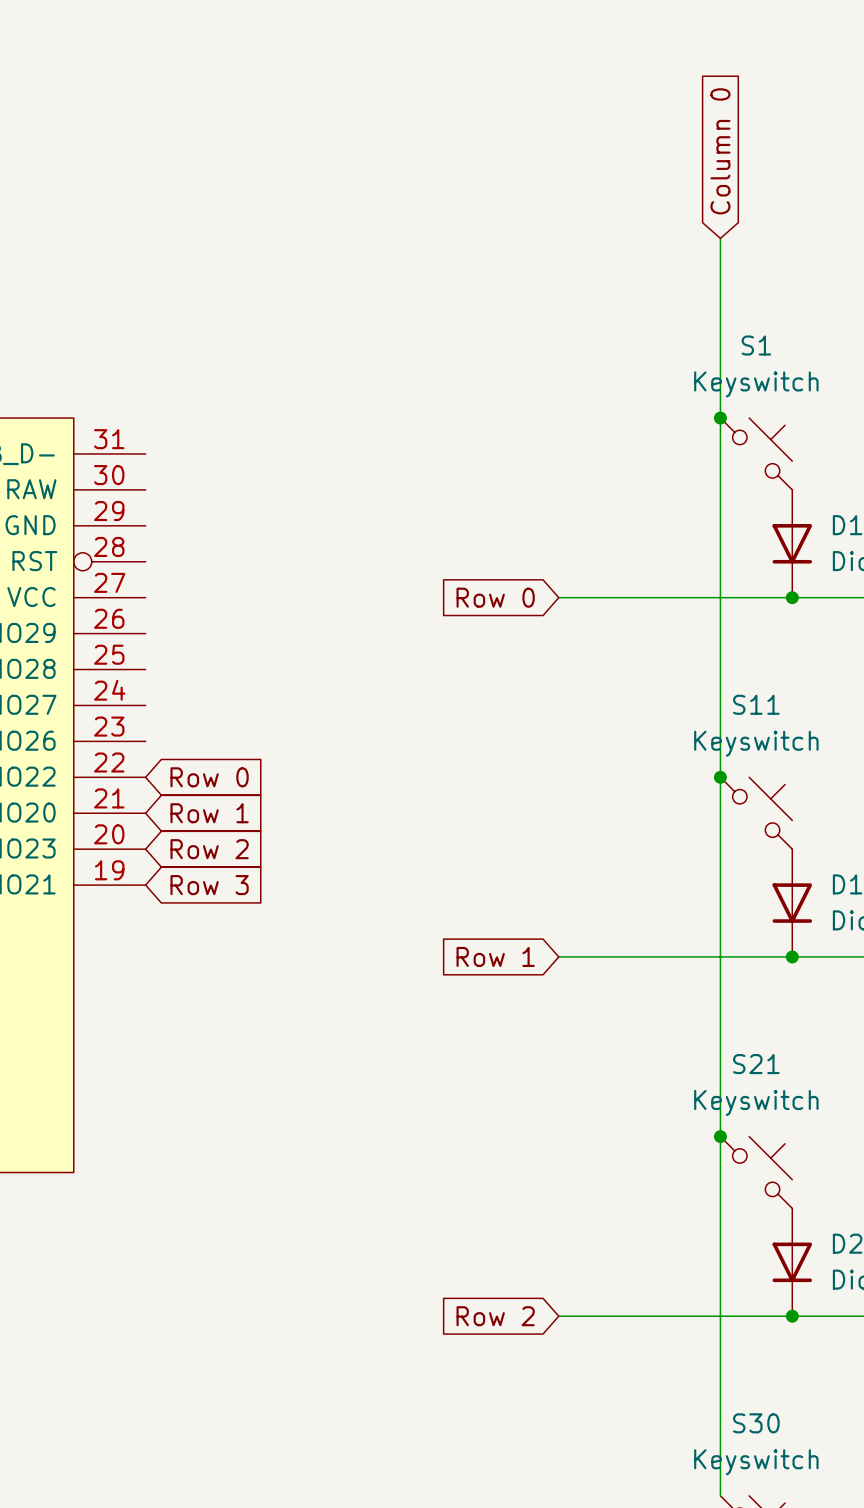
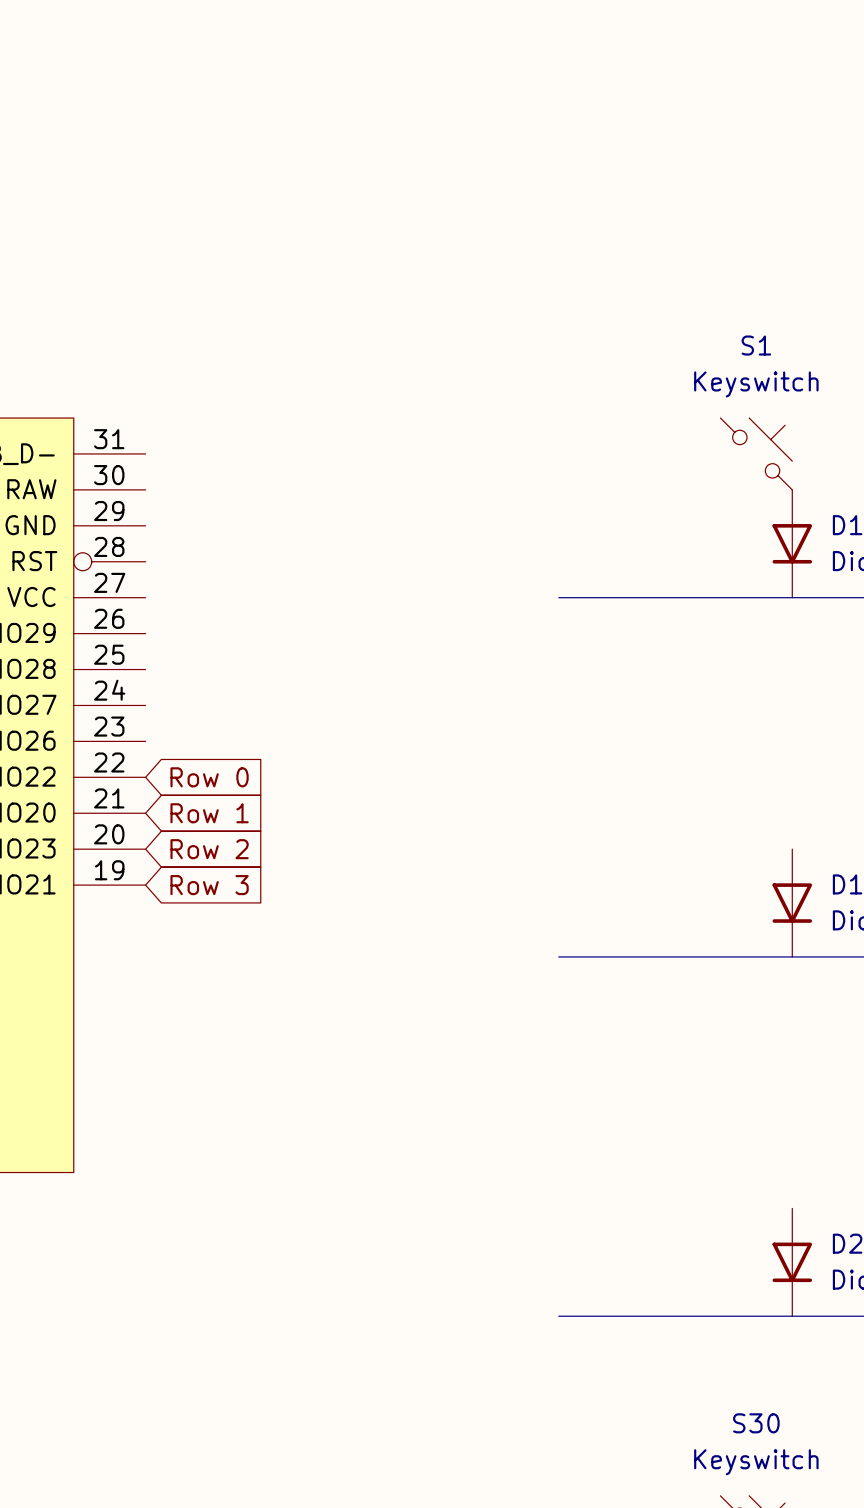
global label: Column 0 (720, 151) -> none
wire: (720, 238) (720, 1495) -> none
junction: (720, 418) -> none
global label: Row 0 (495, 597) -> none
junction: (792, 597) -> none
junction: (720, 777) -> none
S11: Keyswitch (756, 813) -> none
global label: Row 1 (495, 956) -> none
junction: (792, 956) -> none
junction: (720, 1136) -> none
S21: Keyswitch (756, 1172) -> none
global label: Row 2 (495, 1316) -> none
junction: (792, 1316) -> none

